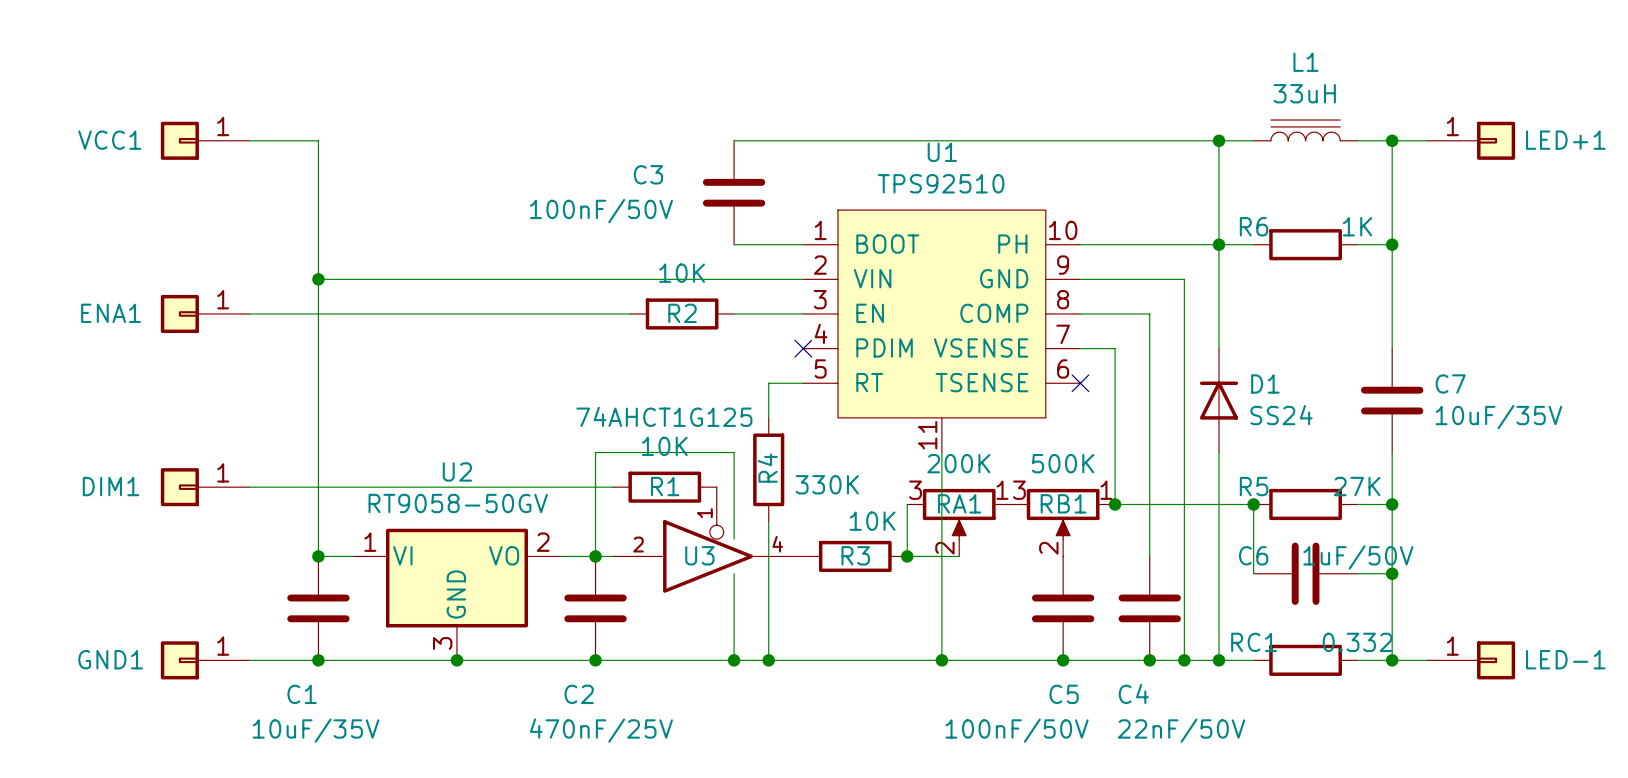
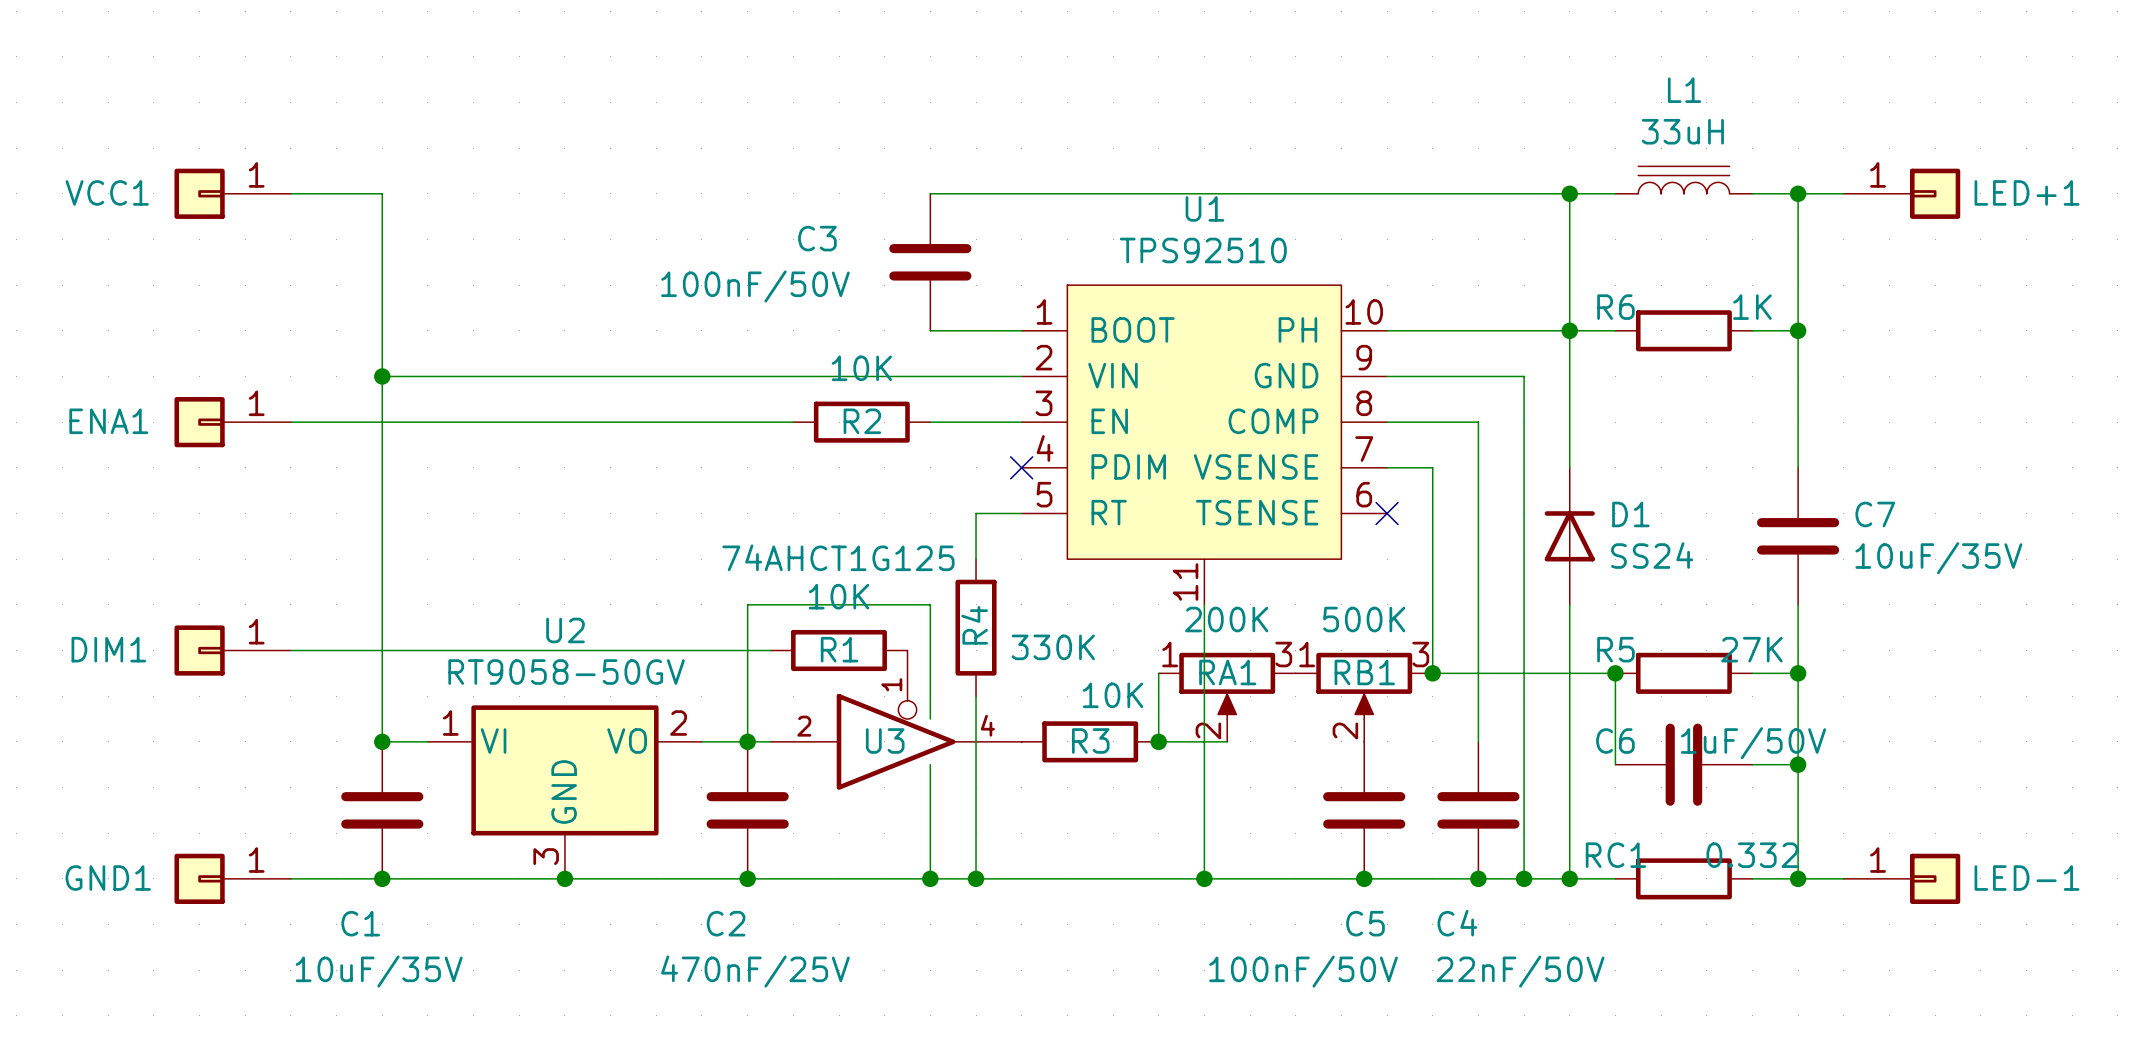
RA1 flip: as is (959, 514) -> left-right (1227, 685)
RB1 flip: as is (1063, 514) -> left-right (1364, 685)

